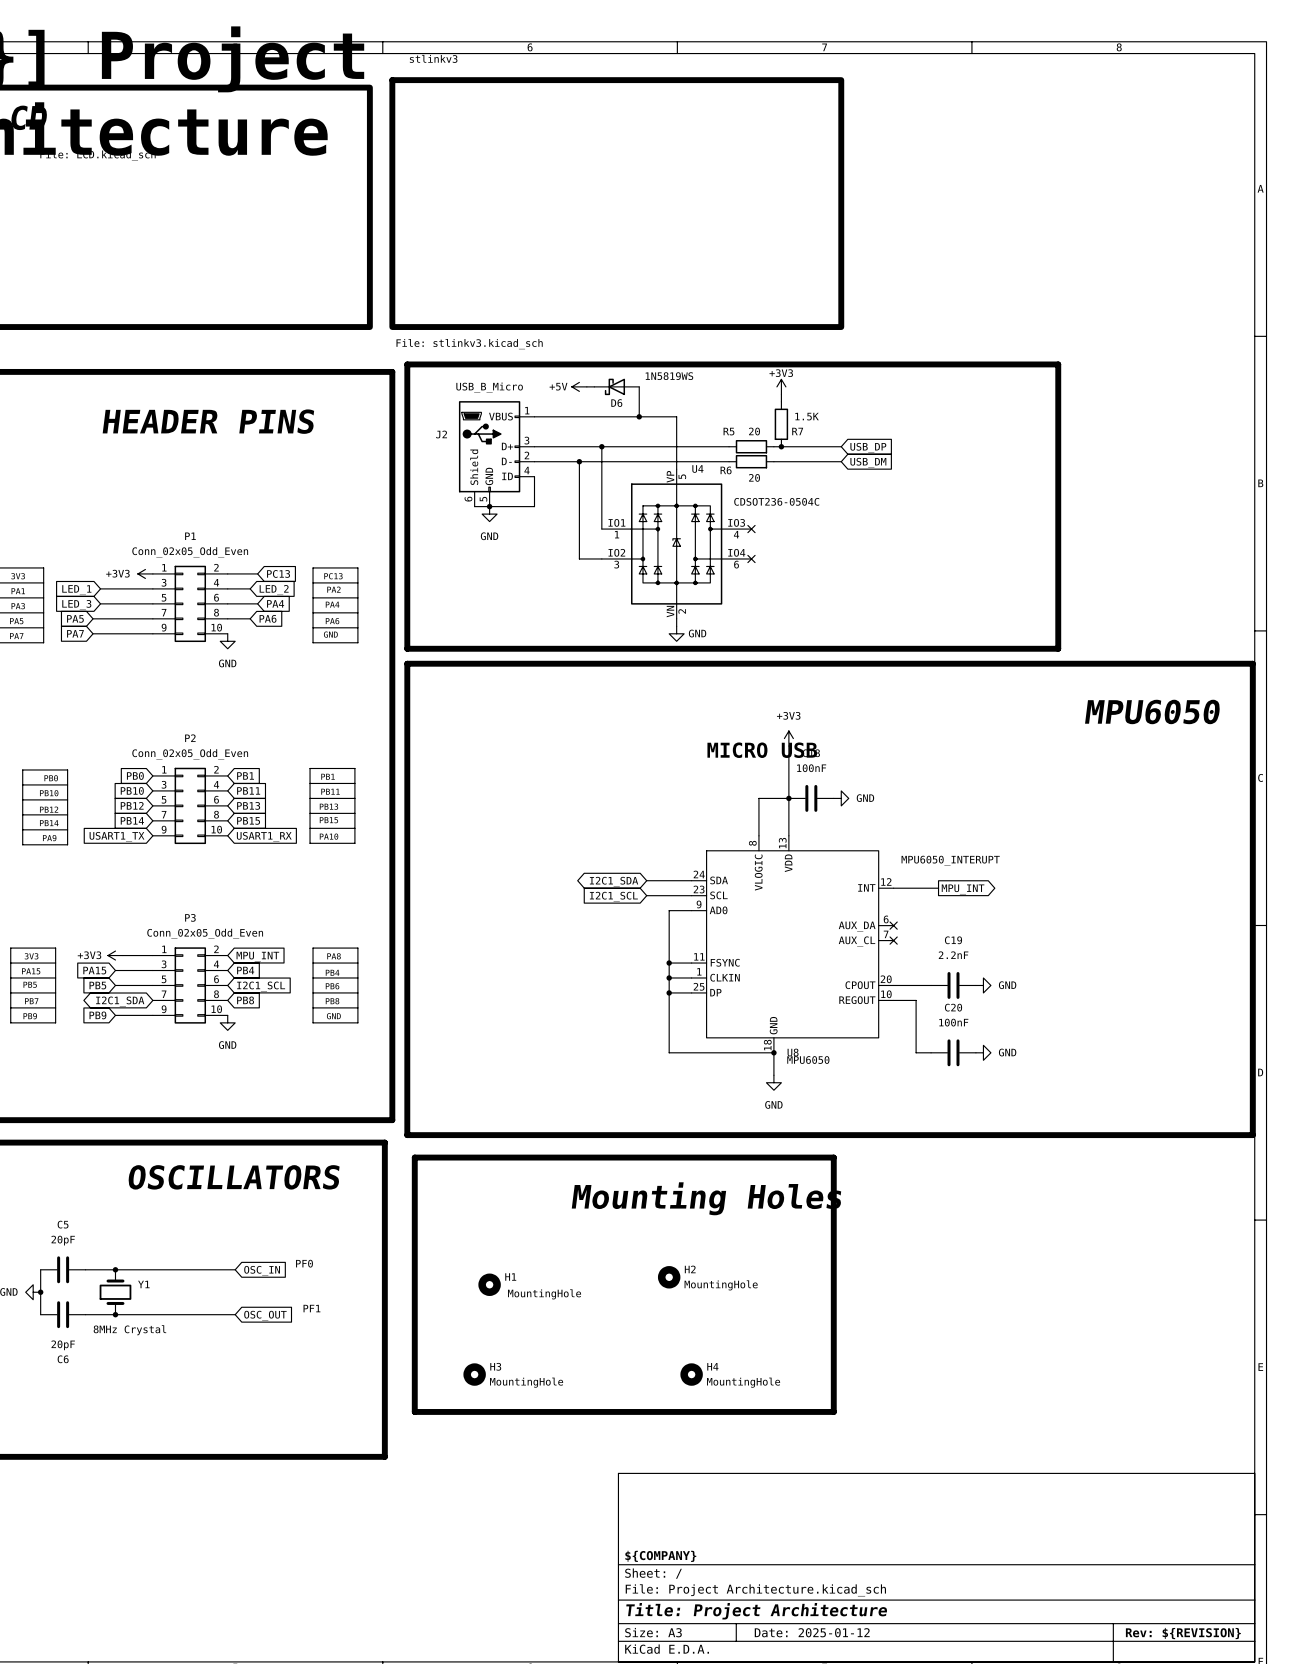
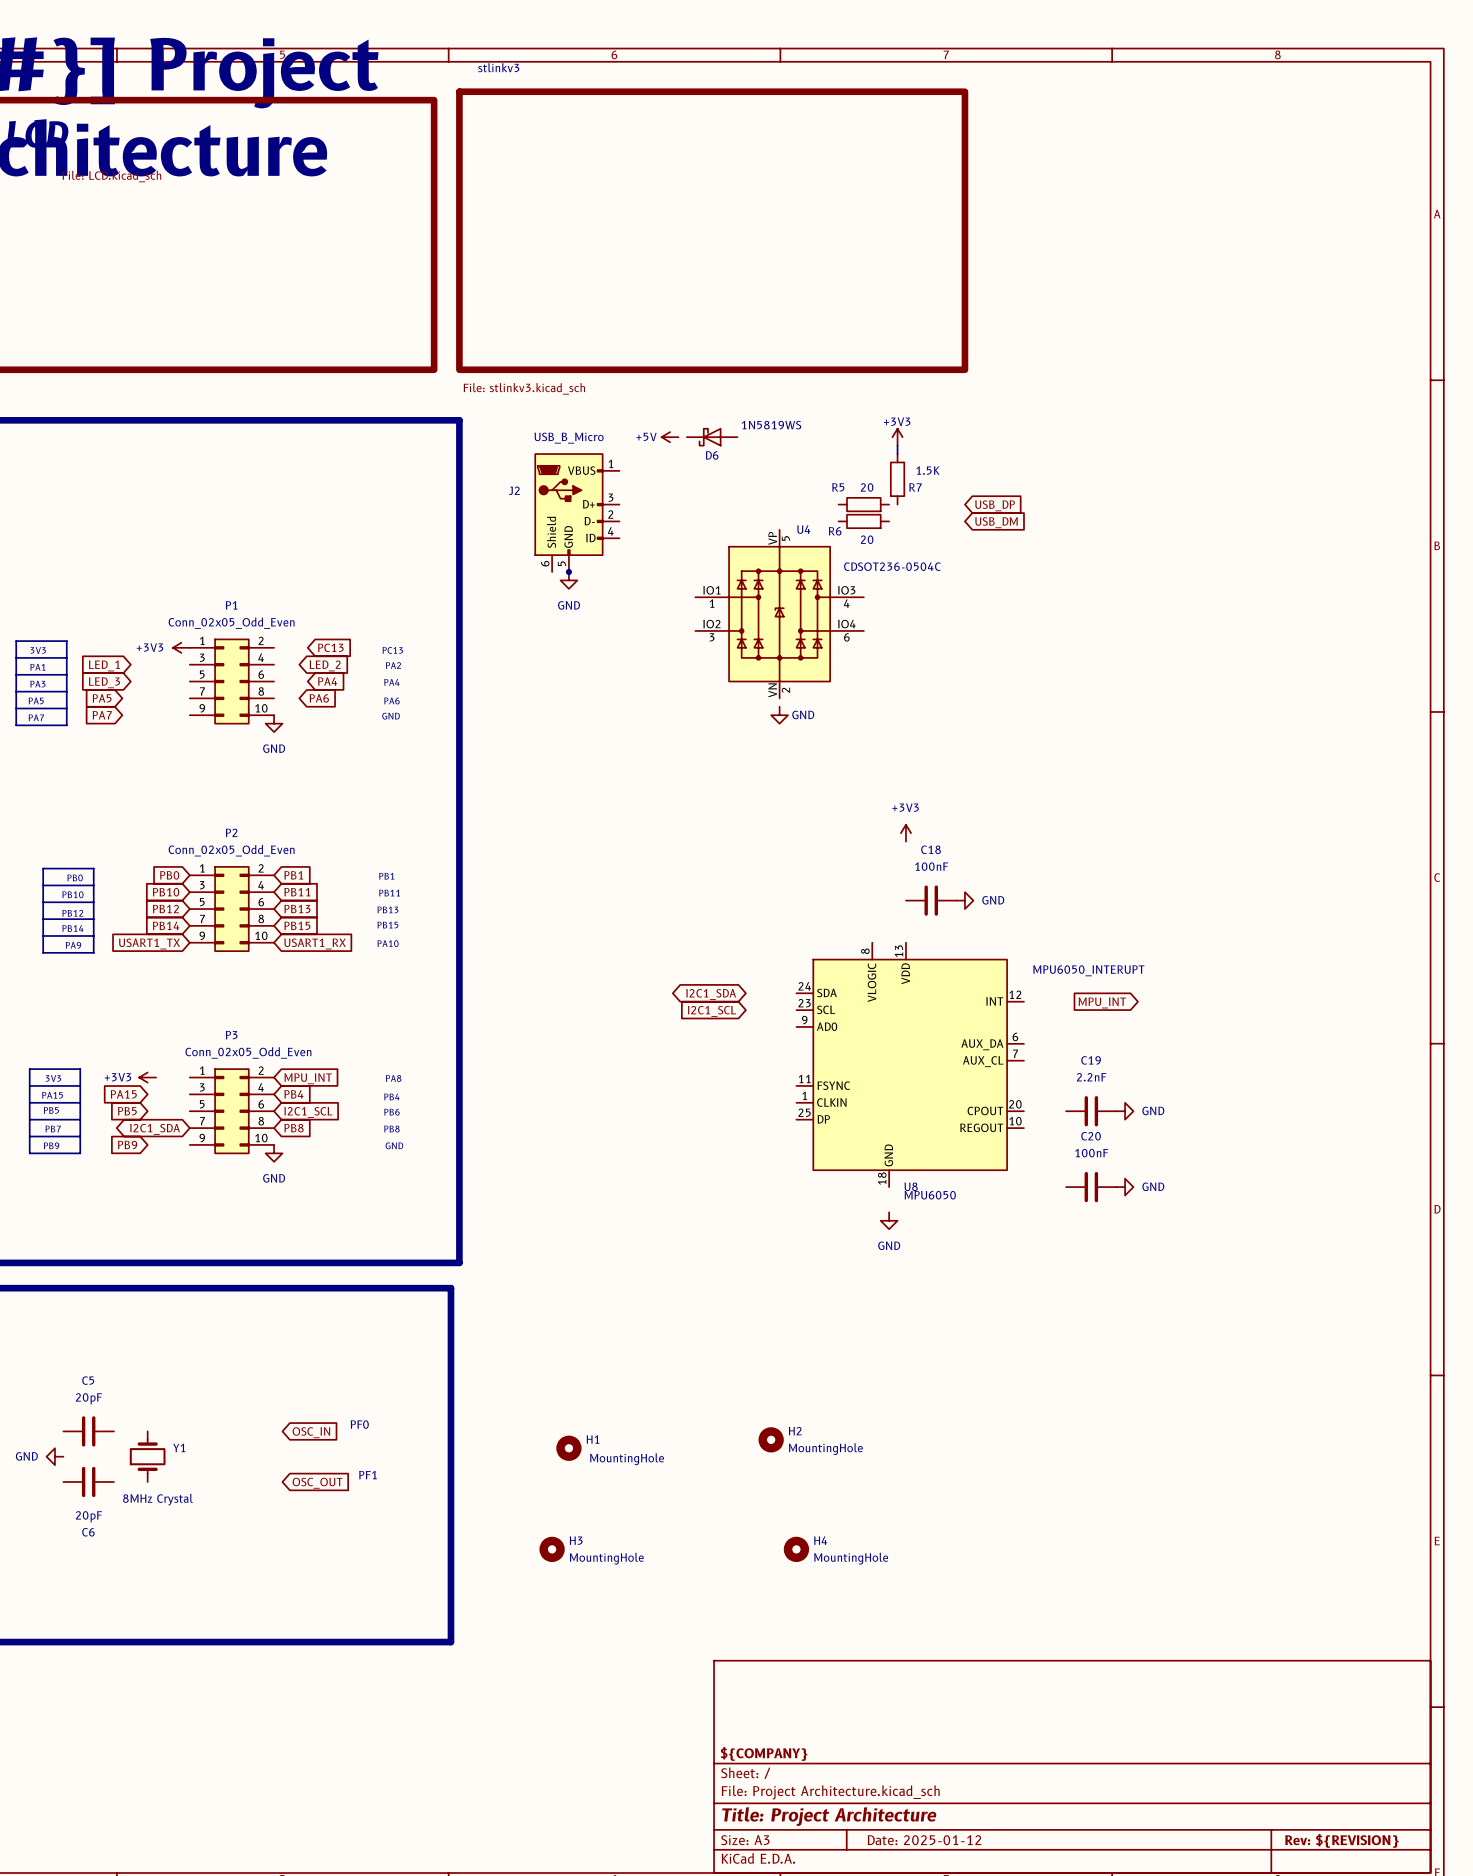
line: (407, 364) (407, 648) (1058, 648) (1058, 364) (407, 364) -> none
wire: (586, 386) (594, 386) -> none
wire: (639, 386) (639, 416) -> none
wire: (534, 416) (676, 416) (676, 469) -> none
junction: (639, 416) -> none
text: HEADER PINS (208, 421) -> none
wire: (534, 446) (729, 446) -> none
wire: (601, 446) (601, 529) -> none
junction: (601, 446) -> none
wire: (773, 446) (841, 446) -> none
junction: (781, 446) -> none
wire: (534, 461) (729, 461) -> none
wire: (579, 461) (579, 558) (601, 558) -> none
junction: (579, 461) -> none
wire: (773, 461) (841, 461) -> none
wire: (534, 476) (534, 506) (474, 506) -> none
no-connect mark: (751, 529) -> none
no-connect mark: (751, 558) -> none
line: (313, 567) (313, 642) (357, 642) (357, 567) (313, 567) -> none
wire: (227, 573) (257, 573) -> none
line: (313, 582) (357, 582) -> none
wire: (100, 588) (152, 588) -> none
wire: (227, 588) (250, 588) -> none
line: (313, 597) (357, 597) -> none
wire: (100, 603) (152, 603) -> none
wire: (227, 603) (257, 603) -> none
line: (313, 612) (357, 612) -> none
wire: (93, 618) (152, 618) -> none
wire: (227, 618) (250, 618) -> none
wire: (676, 618) (676, 626) -> none
line: (313, 627) (357, 627) -> none
wire: (93, 633) (152, 633) -> none
line: (407, 663) (1252, 663) (1252, 1135) (407, 1135) (407, 663) -> none
text: MPU6050 (1152, 711) -> none
wire: (788, 746) (788, 835) -> none
text: MICRO USB (762, 750) -> none
line: (310, 768) (354, 768) (354, 843) (310, 843) (310, 768) -> none
line: (310, 783) (354, 783) -> none
line: (310, 798) (354, 798) -> none
wire: (788, 798) (758, 798) (758, 835) -> none
junction: (788, 798) -> none
line: (310, 813) (354, 813) -> none
line: (310, 828) (354, 828) -> none
wire: (646, 880) (691, 880) -> none
wire: (893, 888) (938, 888) -> none
wire: (646, 895) (691, 895) -> none
wire: (691, 910) (669, 910) (669, 1052) (773, 1052) (773, 1075) -> none
no-connect mark: (893, 925) -> none
no-connect mark: (893, 940) -> none
line: (313, 948) (357, 948) (357, 1022) (313, 1022) (313, 948) -> none
wire: (122, 955) (152, 955) -> none
line: (313, 963) (357, 963) -> none
wire: (669, 963) (691, 963) -> none
junction: (669, 963) -> none
wire: (115, 970) (152, 970) -> none
line: (313, 977) (357, 977) -> none
wire: (669, 977) (691, 977) -> none
junction: (669, 977) -> none
wire: (115, 985) (152, 985) -> none
wire: (893, 985) (931, 985) -> none
line: (313, 992) (357, 992) -> none
wire: (669, 992) (691, 992) -> none
junction: (669, 992) -> none
wire: (893, 1000) (916, 1000) (916, 1052) (931, 1052) -> none
line: (313, 1007) (357, 1007) -> none
wire: (115, 1015) (152, 1015) -> none
junction: (773, 1052) -> none
line: (414, 1157) (833, 1157) (833, 1411) (414, 1411) (414, 1157) -> none
text: OSCILLATORS (233, 1177) -> none
text: Mounting Holes (706, 1198) -> none
wire: (40, 1269) (40, 1314) -> none
wire: (85, 1269) (235, 1269) -> none
junction: (115, 1269) -> none
junction: (40, 1292) -> none
wire: (85, 1314) (235, 1314) -> none
junction: (115, 1314) -> none

